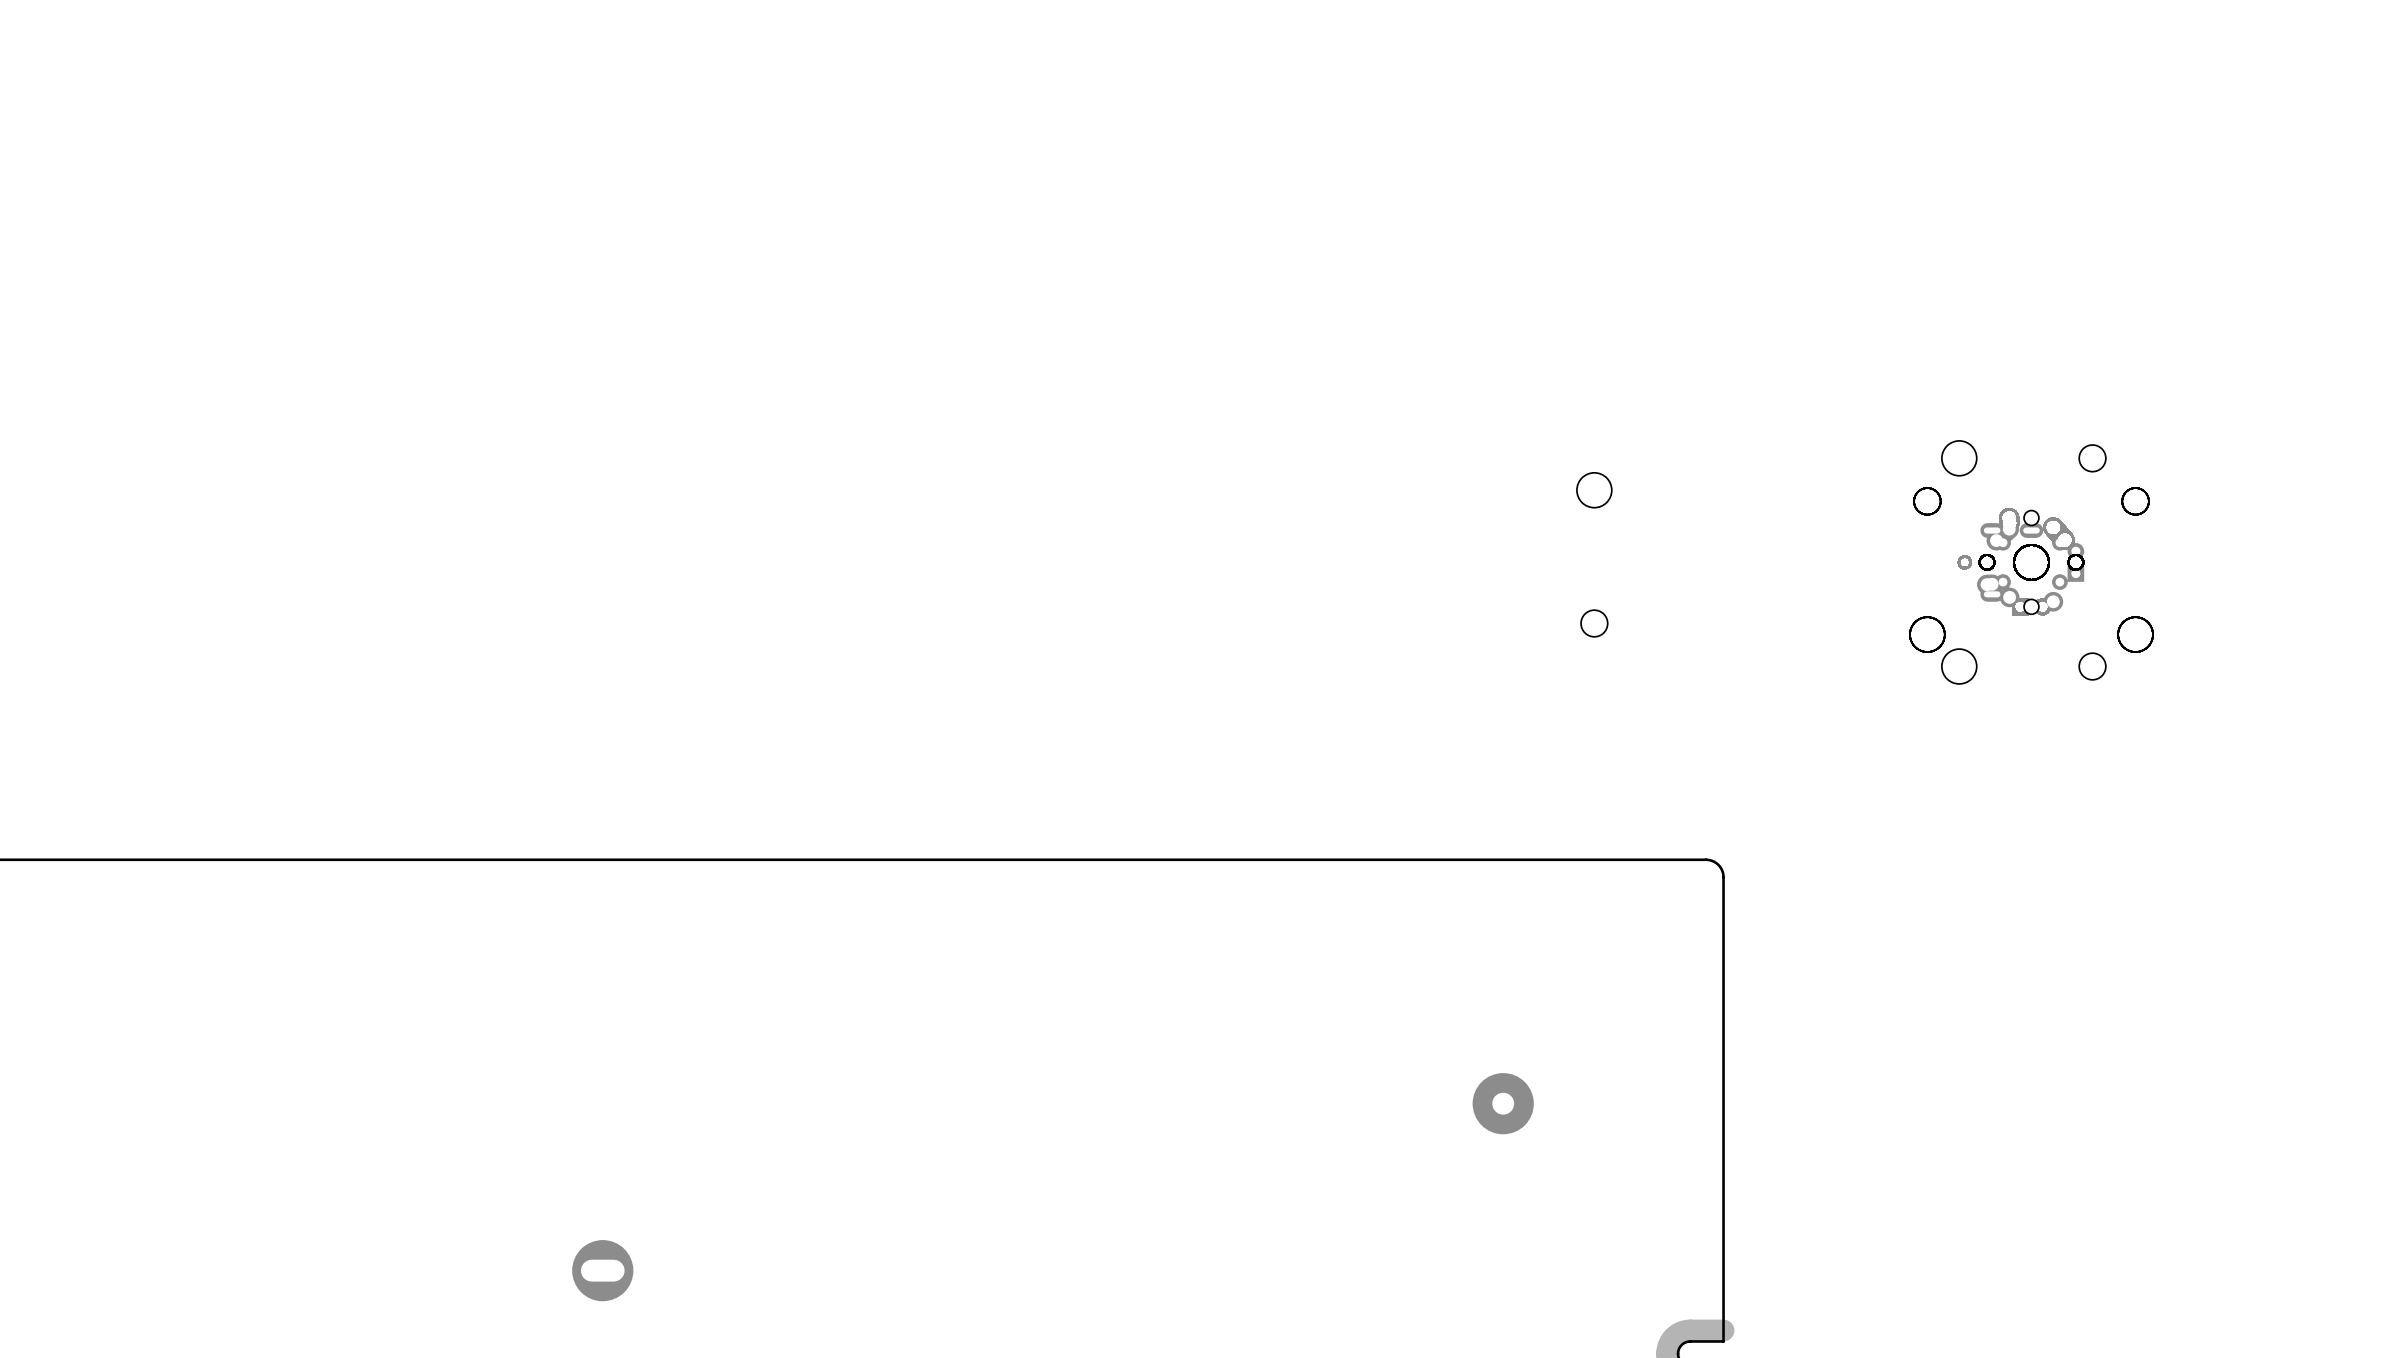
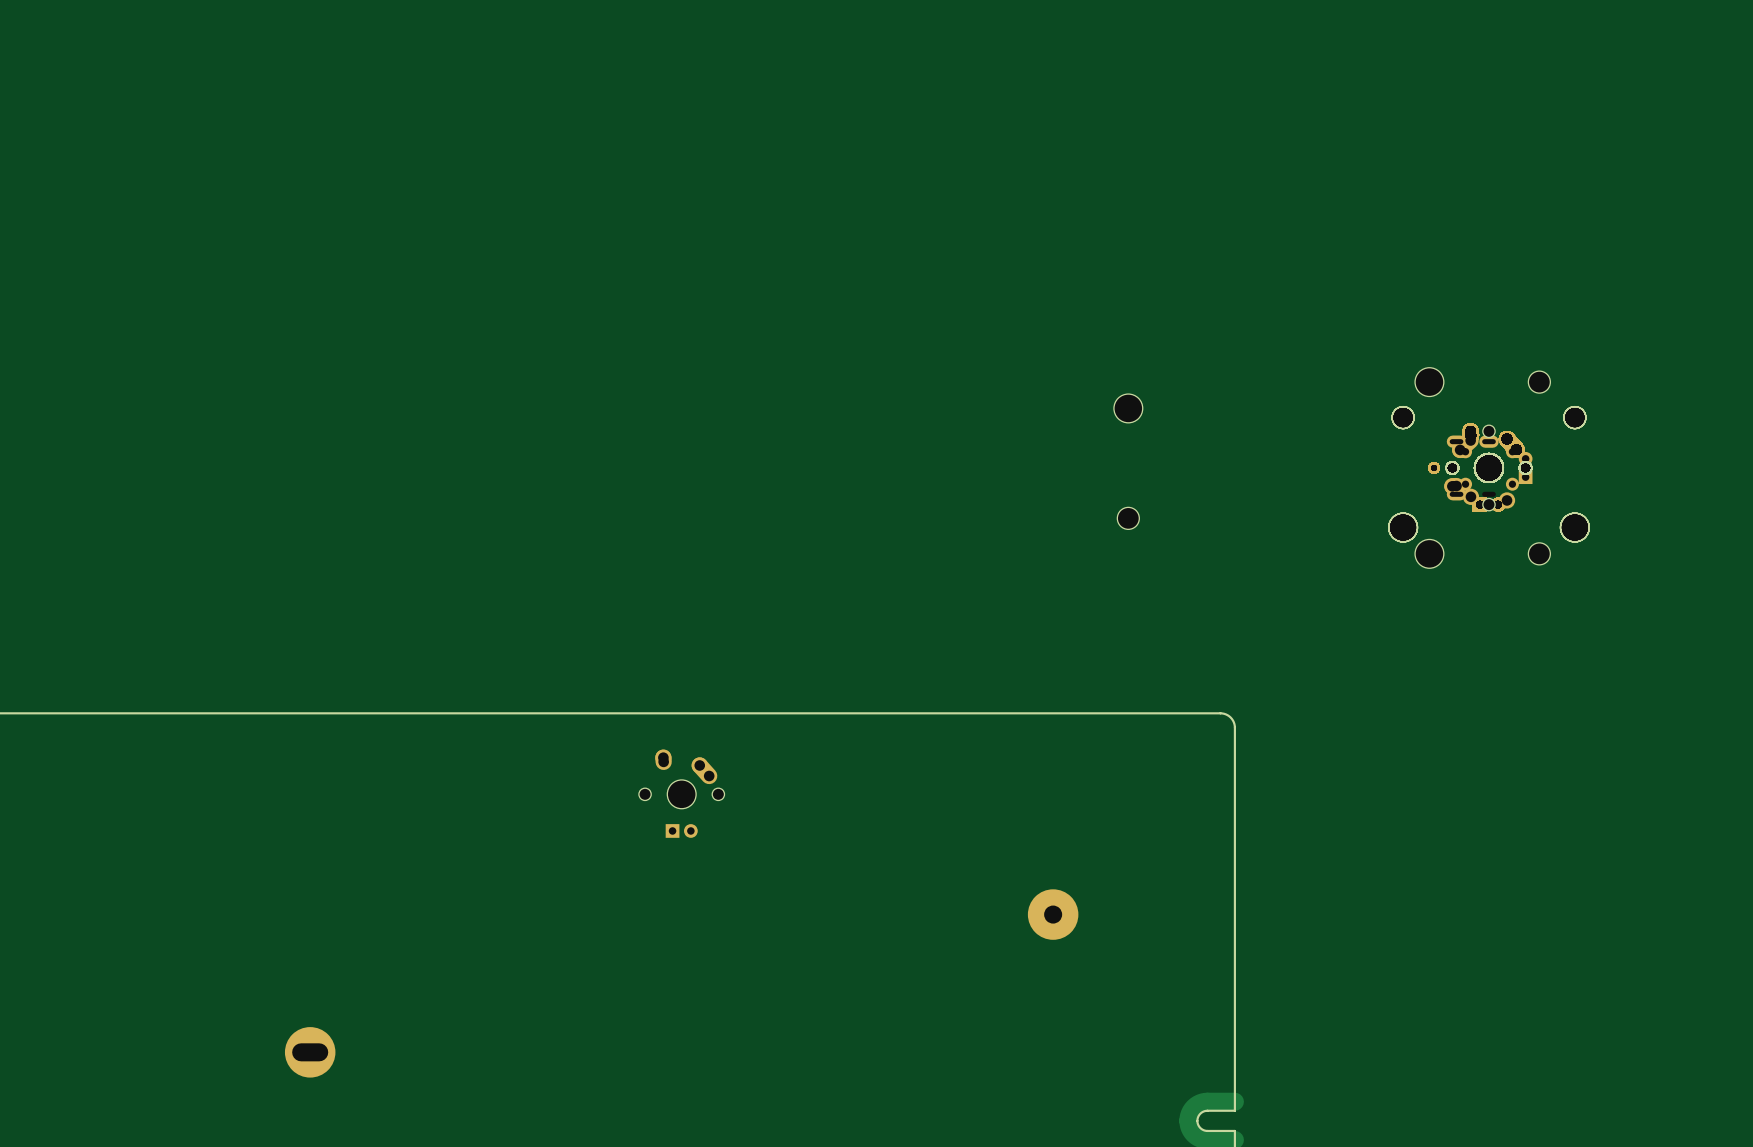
part: none -> (681, 793)

